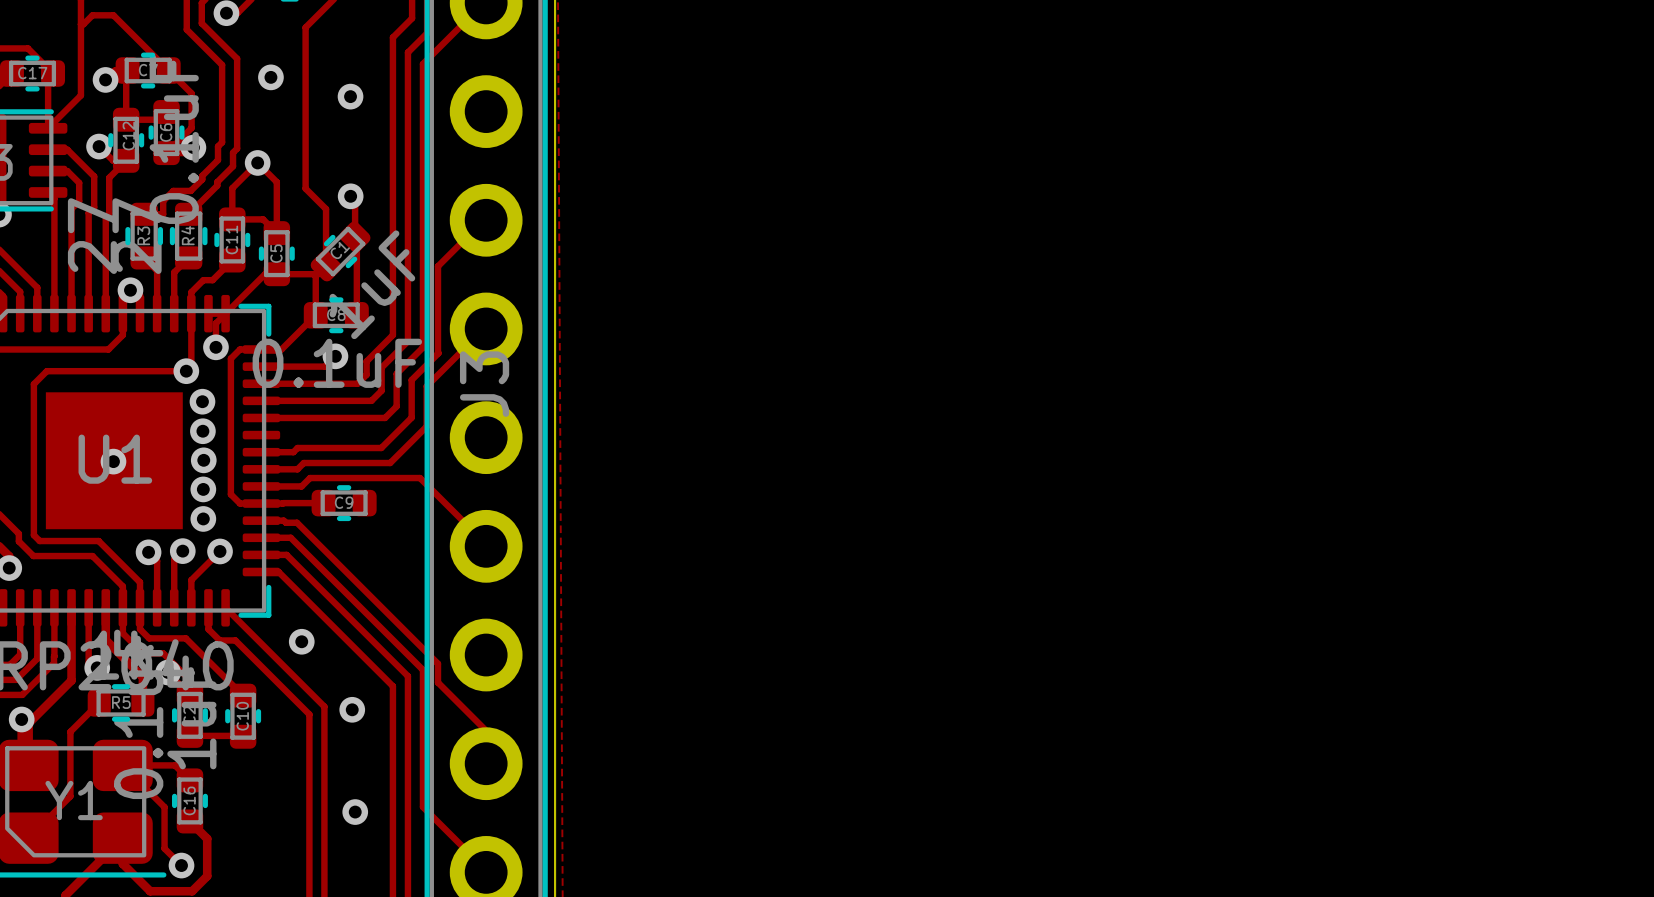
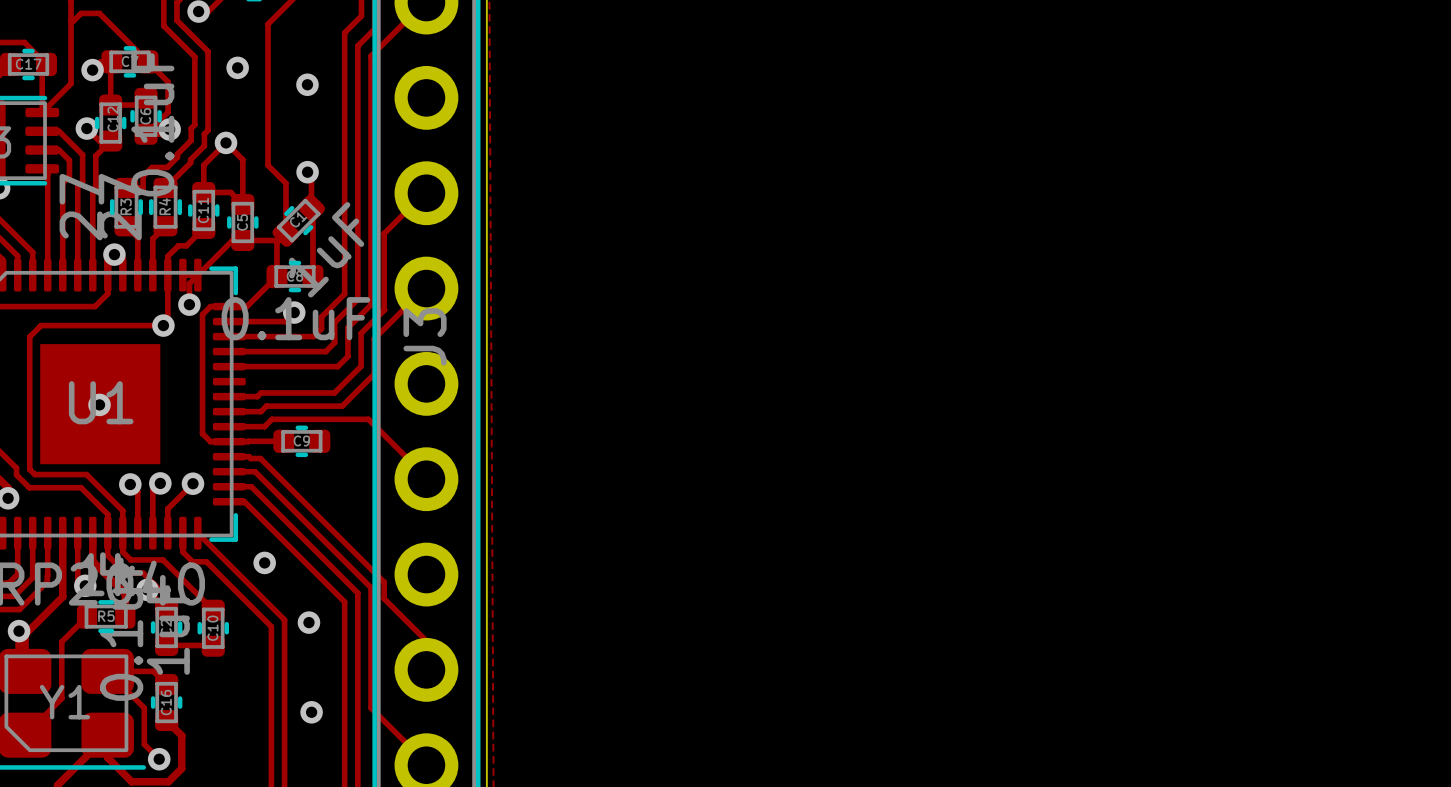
via: (202, 401) -> none
via: (202, 431) -> none
via: (203, 460) -> none
via: (203, 489) -> none
via: (203, 518) -> none

